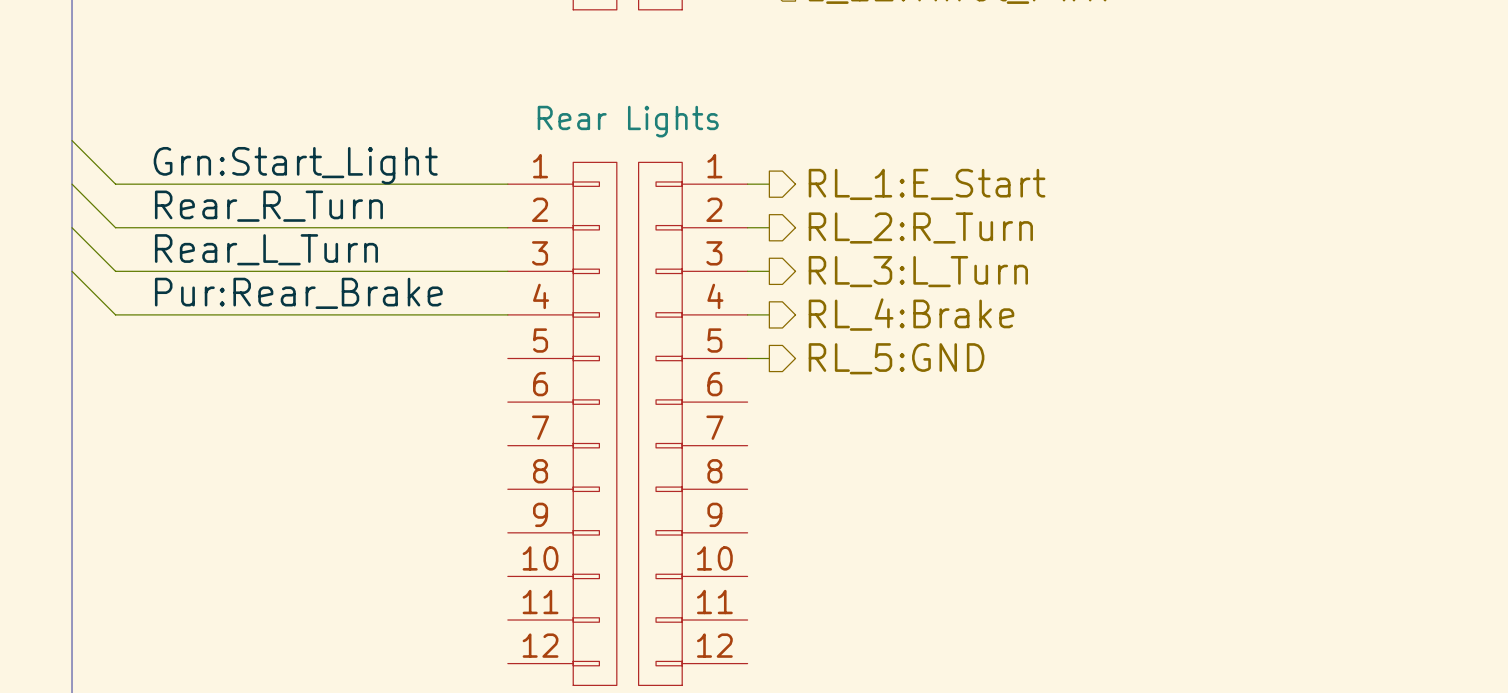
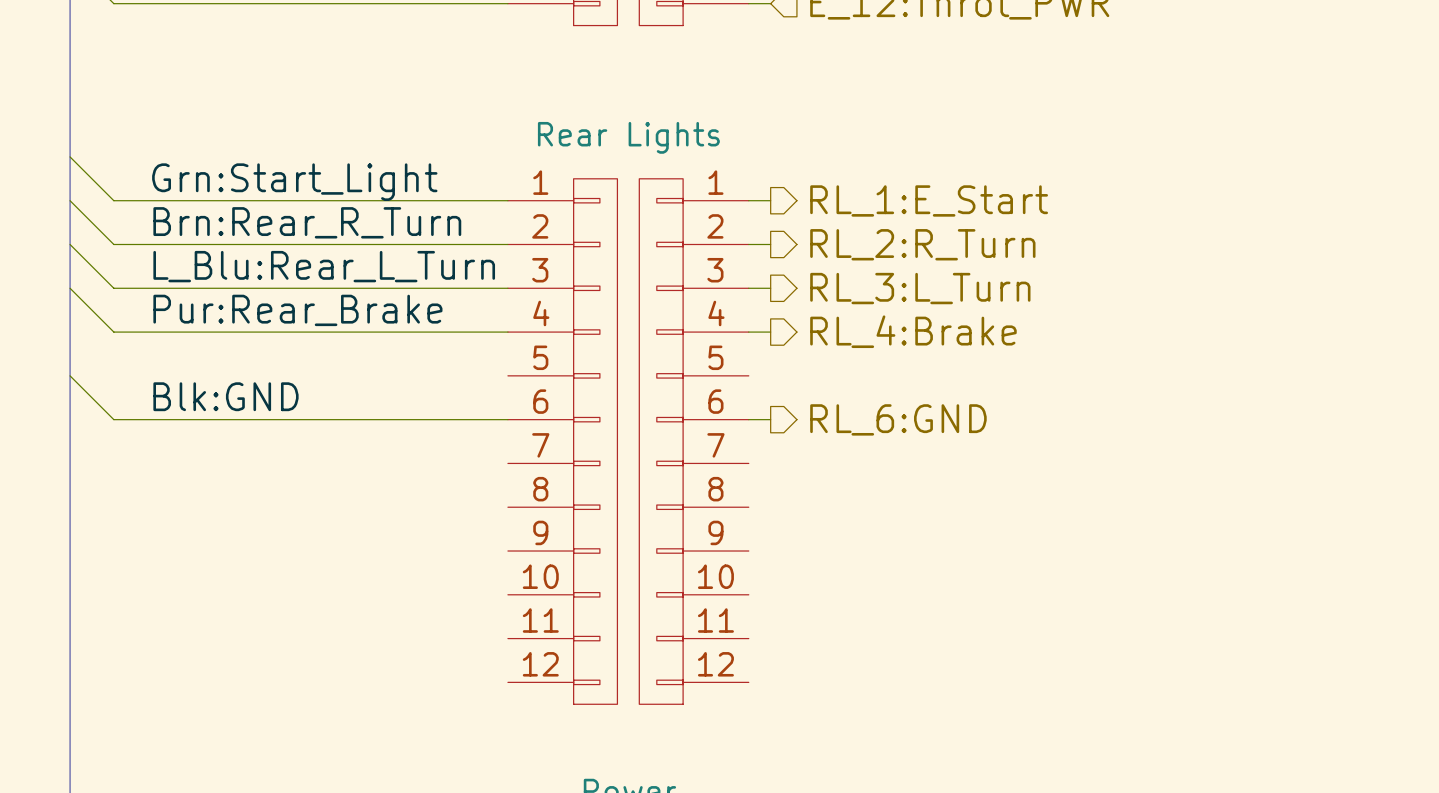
label: Rear_R_Turn (268, 206) -> Brn:Rear_R_Turn (307, 222)
label: Rear_L_Turn (266, 249) -> L_Blu:Rear_L_Turn (324, 266)
wire: none -> (70, 375) (113, 419) (507, 419)
wire: (747, 358) (769, 358) -> (748, 419) (770, 419)
hierarchical label: RL_5:GND (896, 358) -> RL_6:GND (898, 419)
label: none -> Blk:GND (225, 396)

